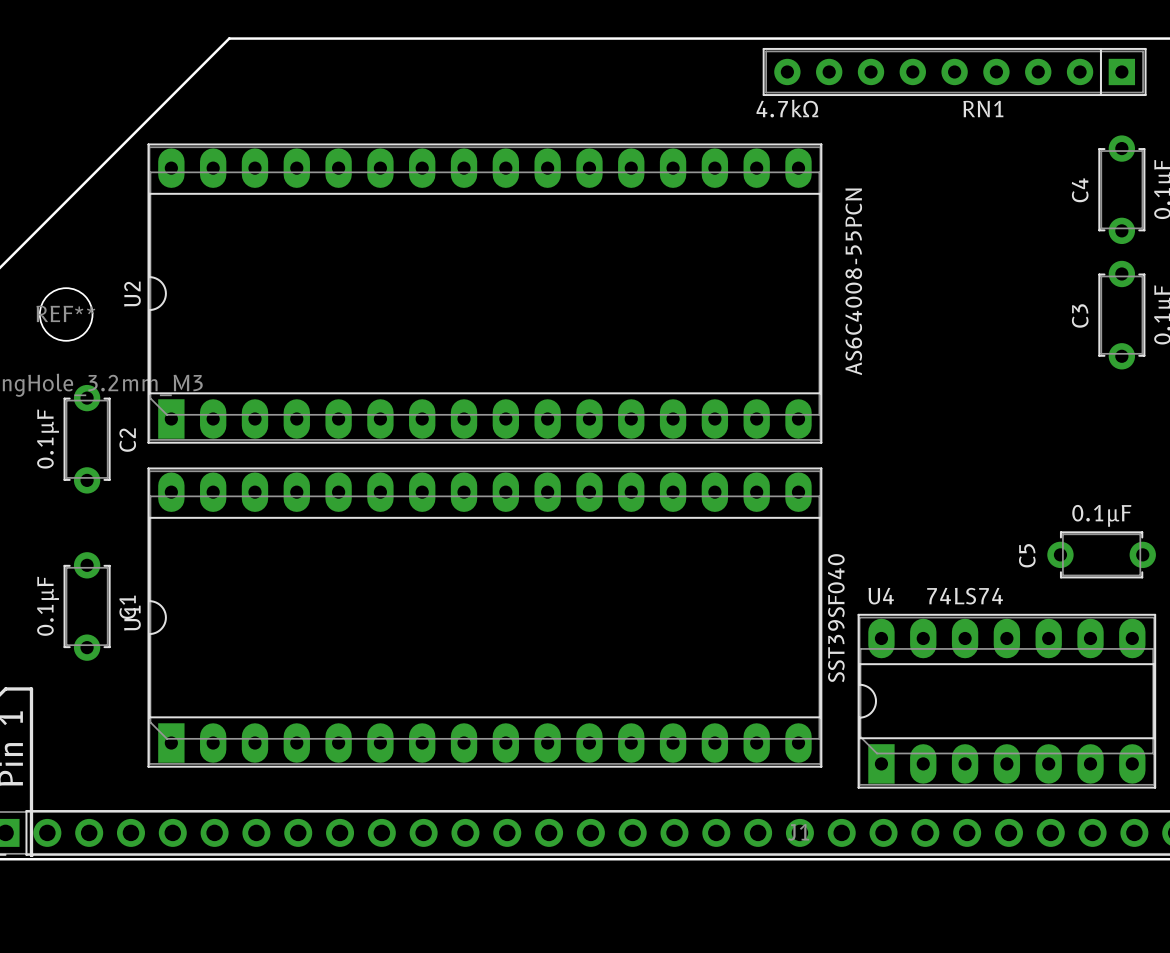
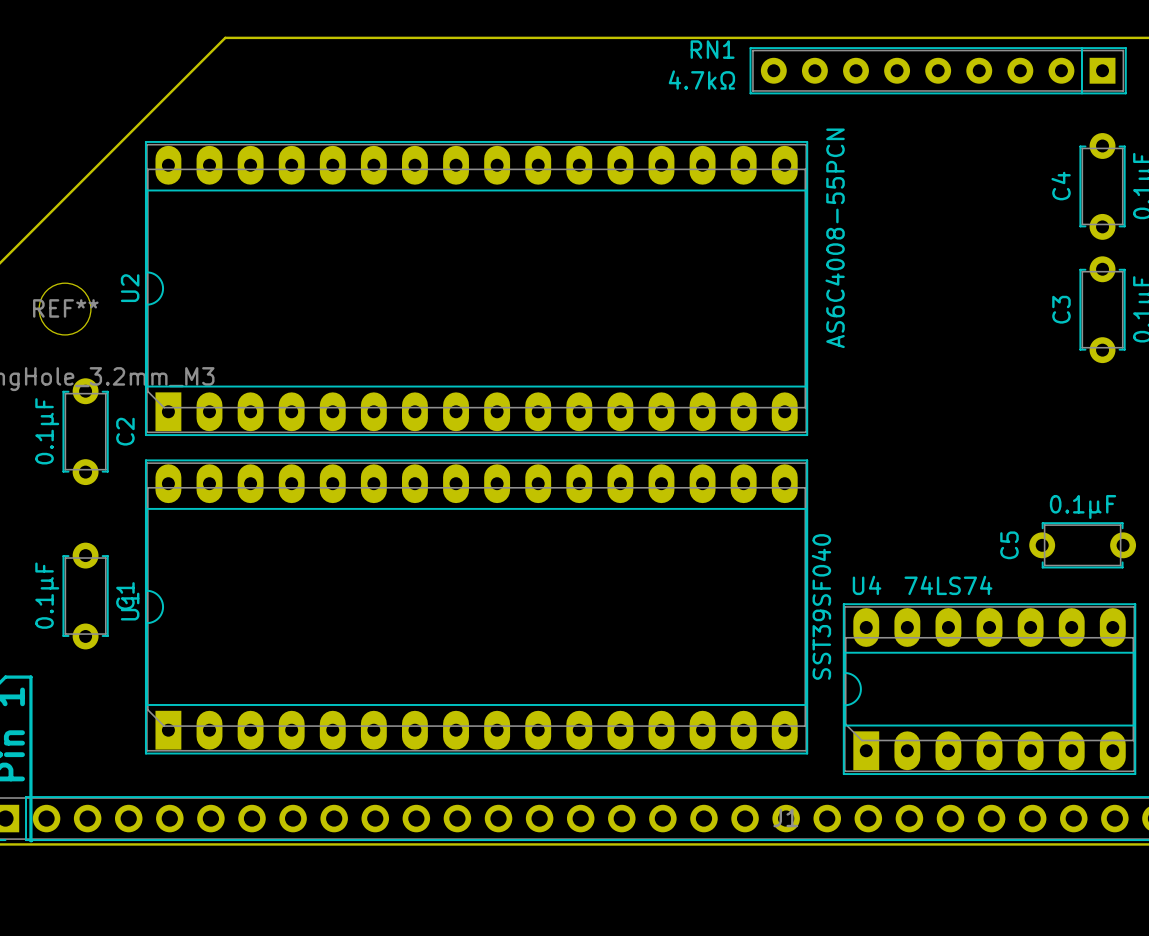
RN1 value position: 4.7kΩ (787, 108) -> 4.7kΩ (701, 80)
RN1 name position: RN1 (983, 109) -> RN1 (712, 49)
U2 value position: AS6C4008-55PCN (853, 281) -> AS6C4008-55PCN (835, 238)

